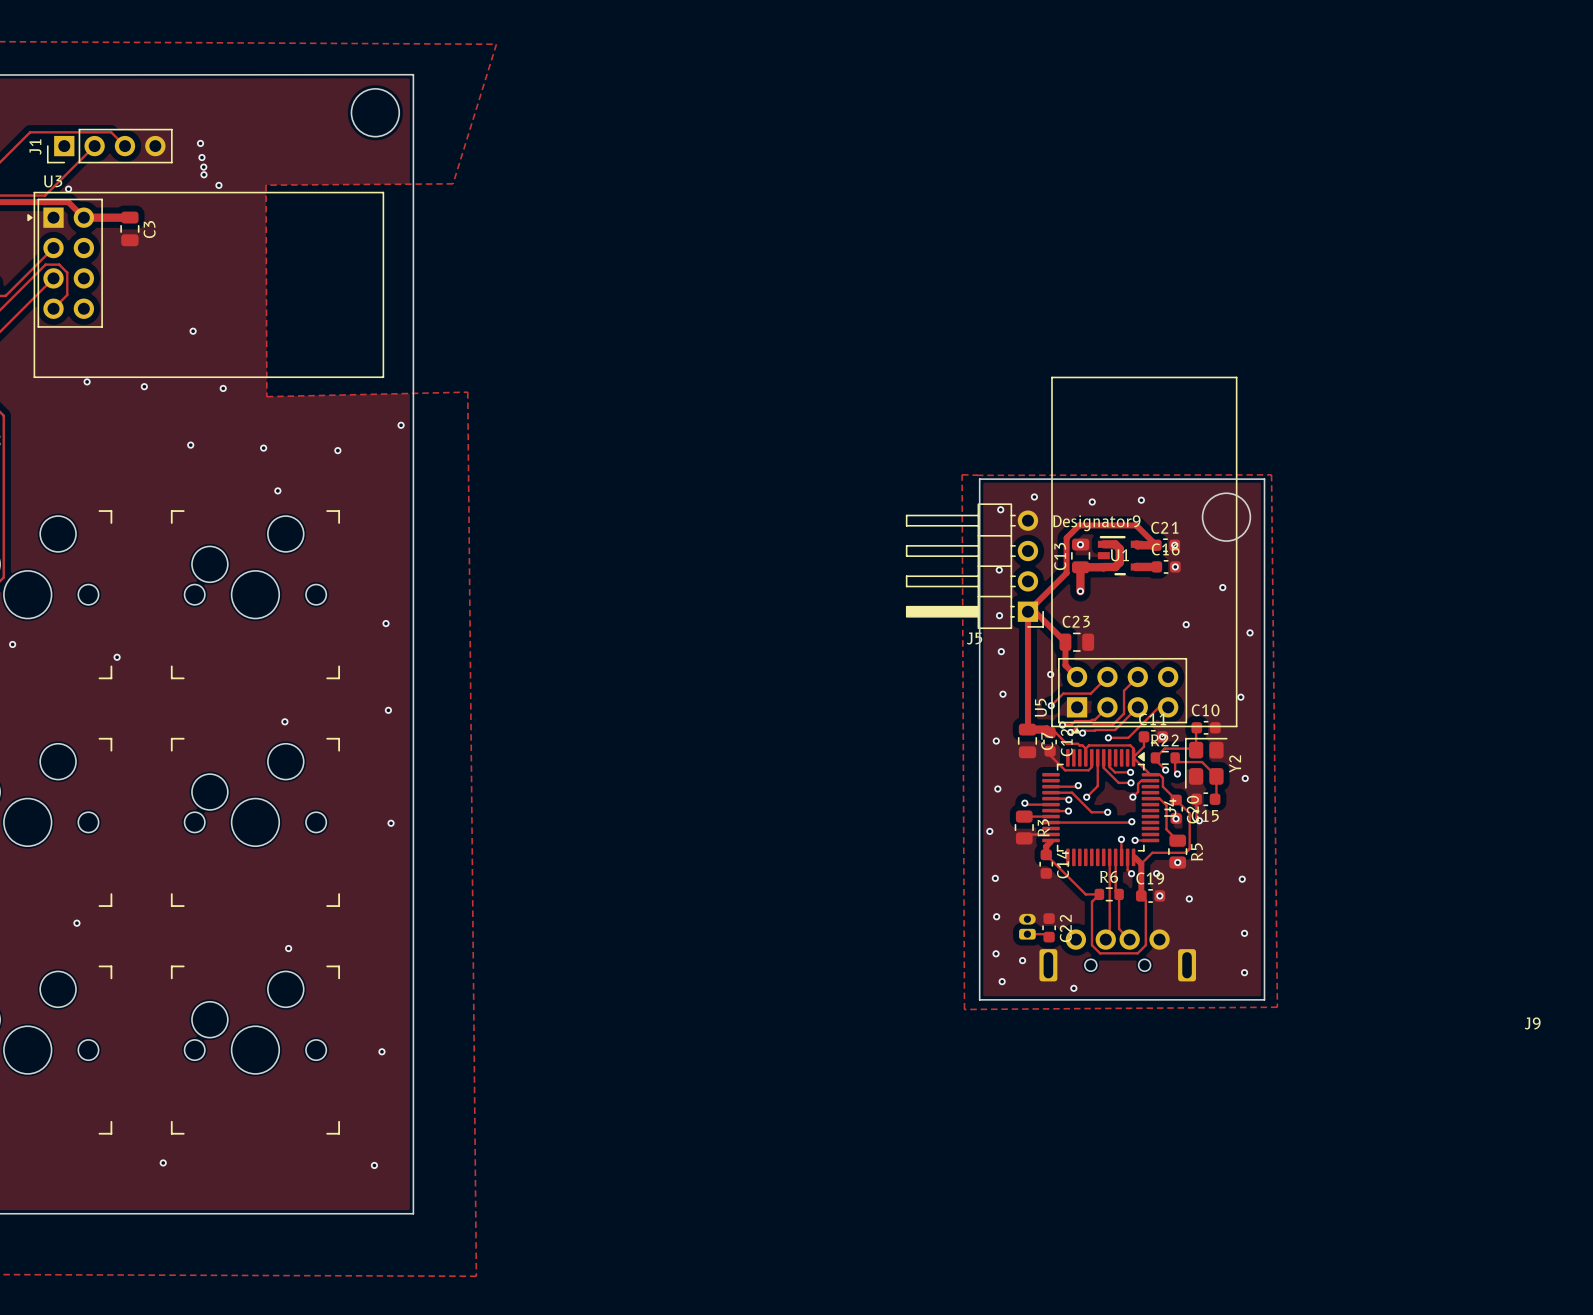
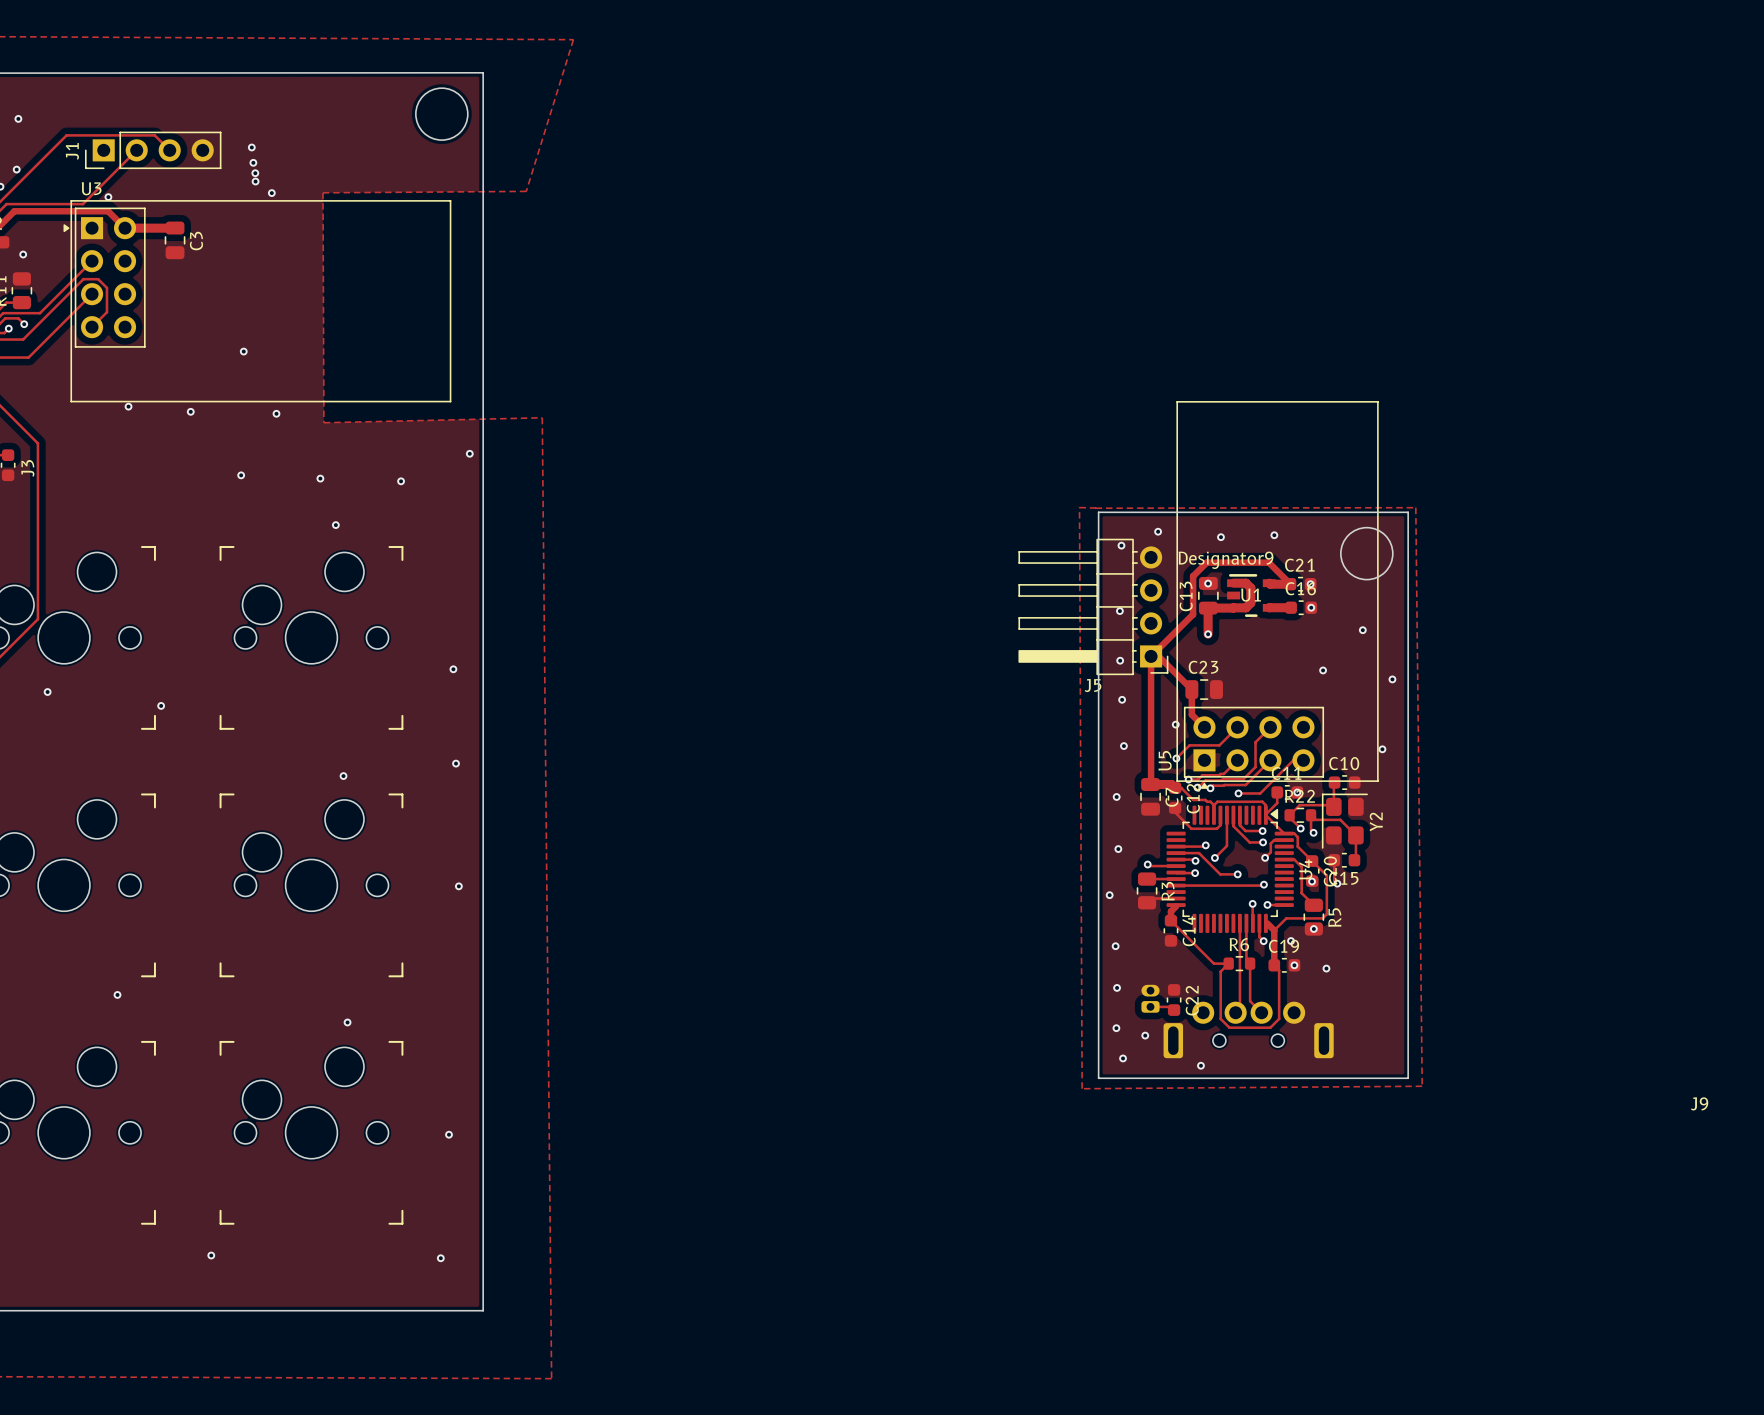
via: (1245, 778) -> none
via: (1242, 879) -> none
via: (1244, 933) -> none
via: (1244, 972) -> none

